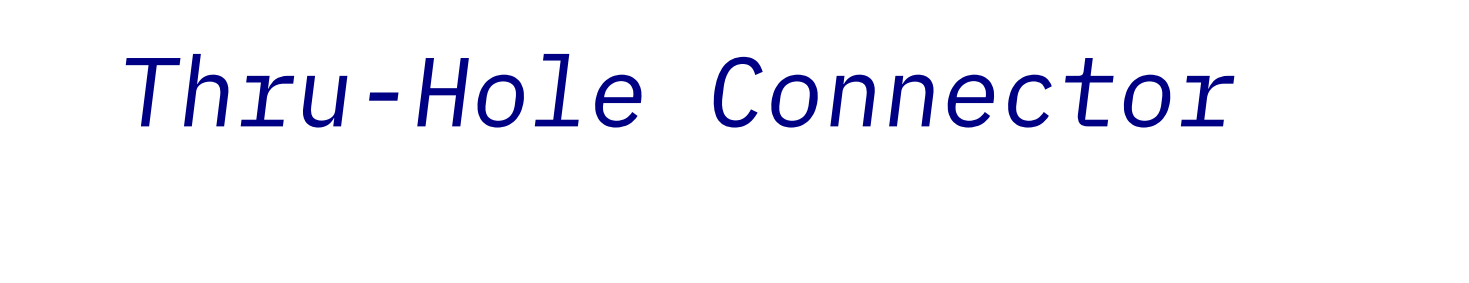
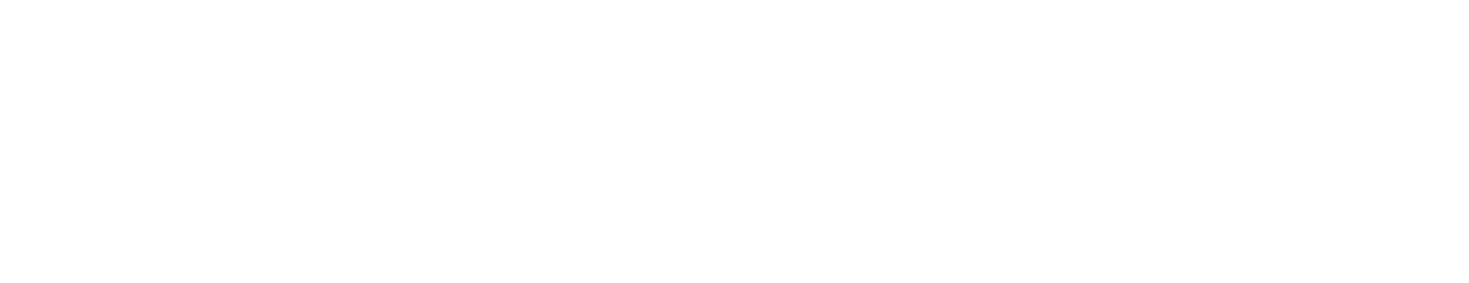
text: Thru-Hole Connector (680, 90) -> none

